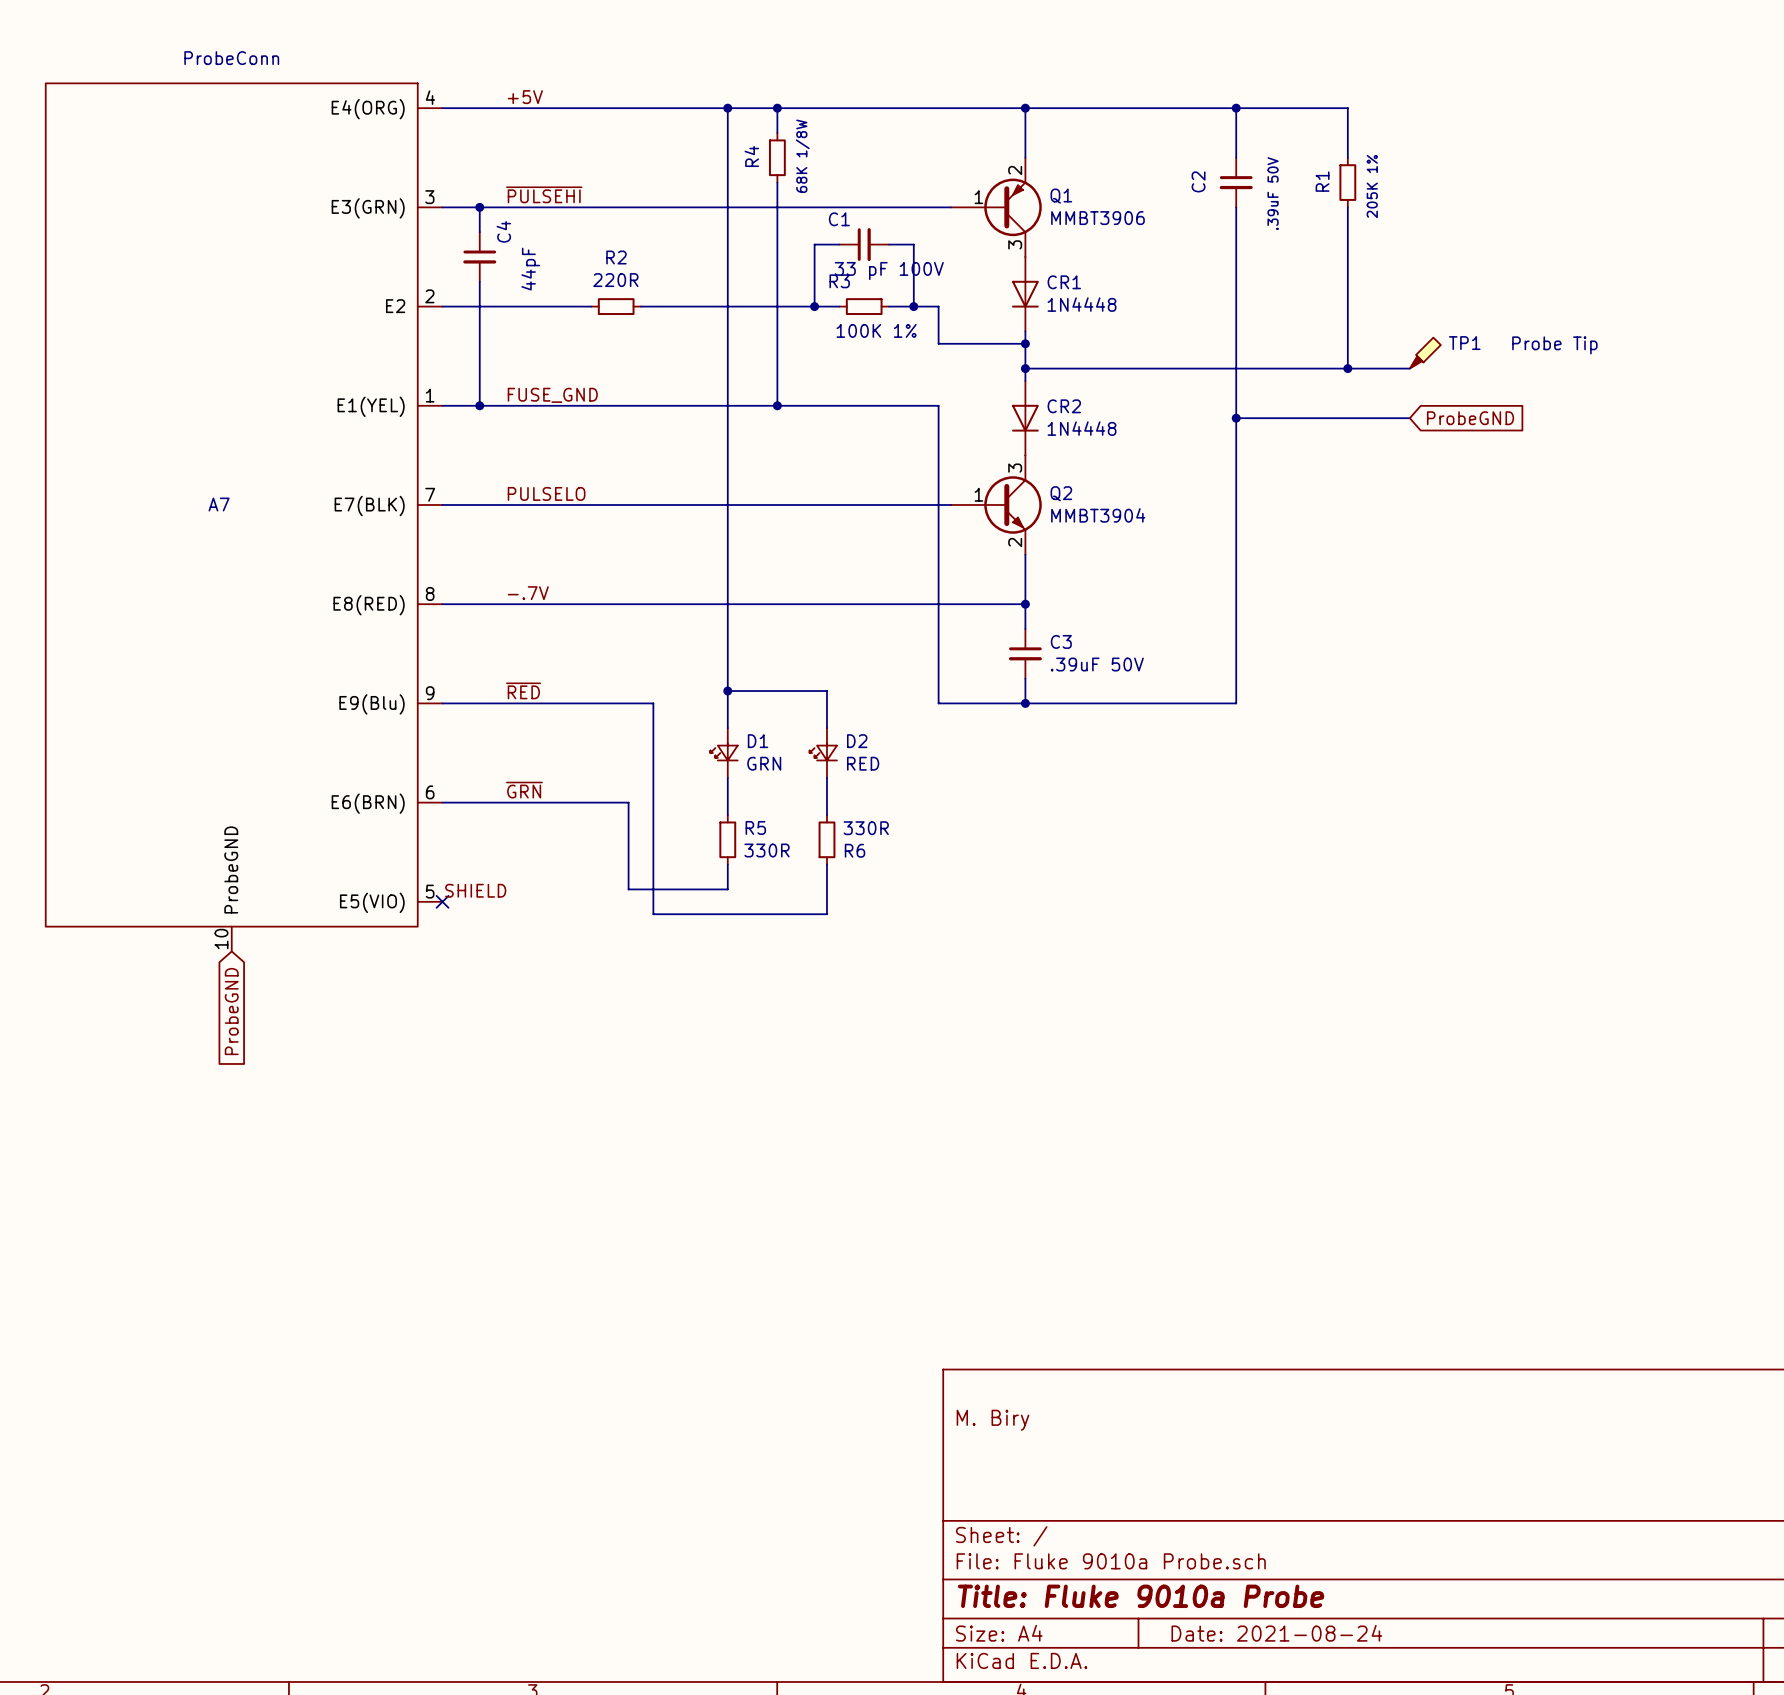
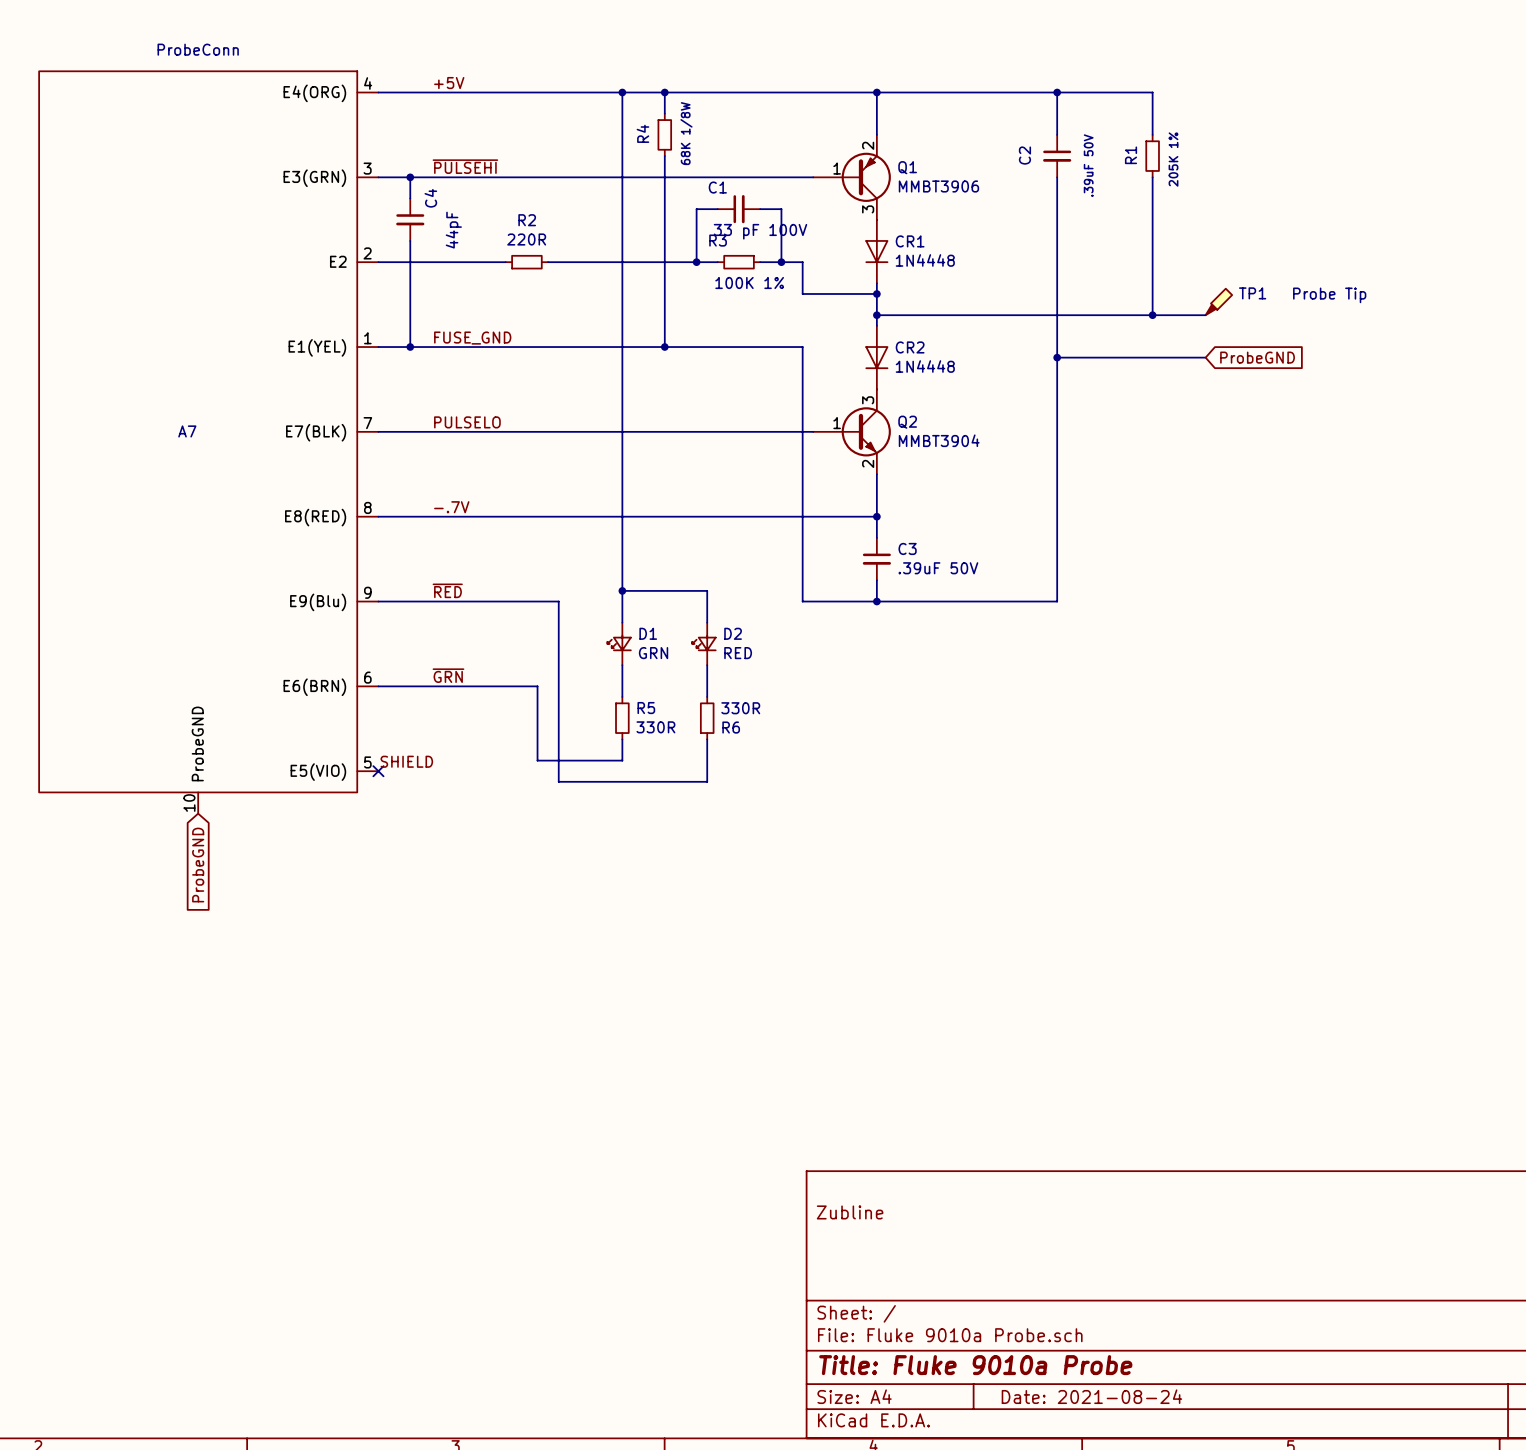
title block: M. Biry (993, 1420) -> Zubline (850, 1212)

